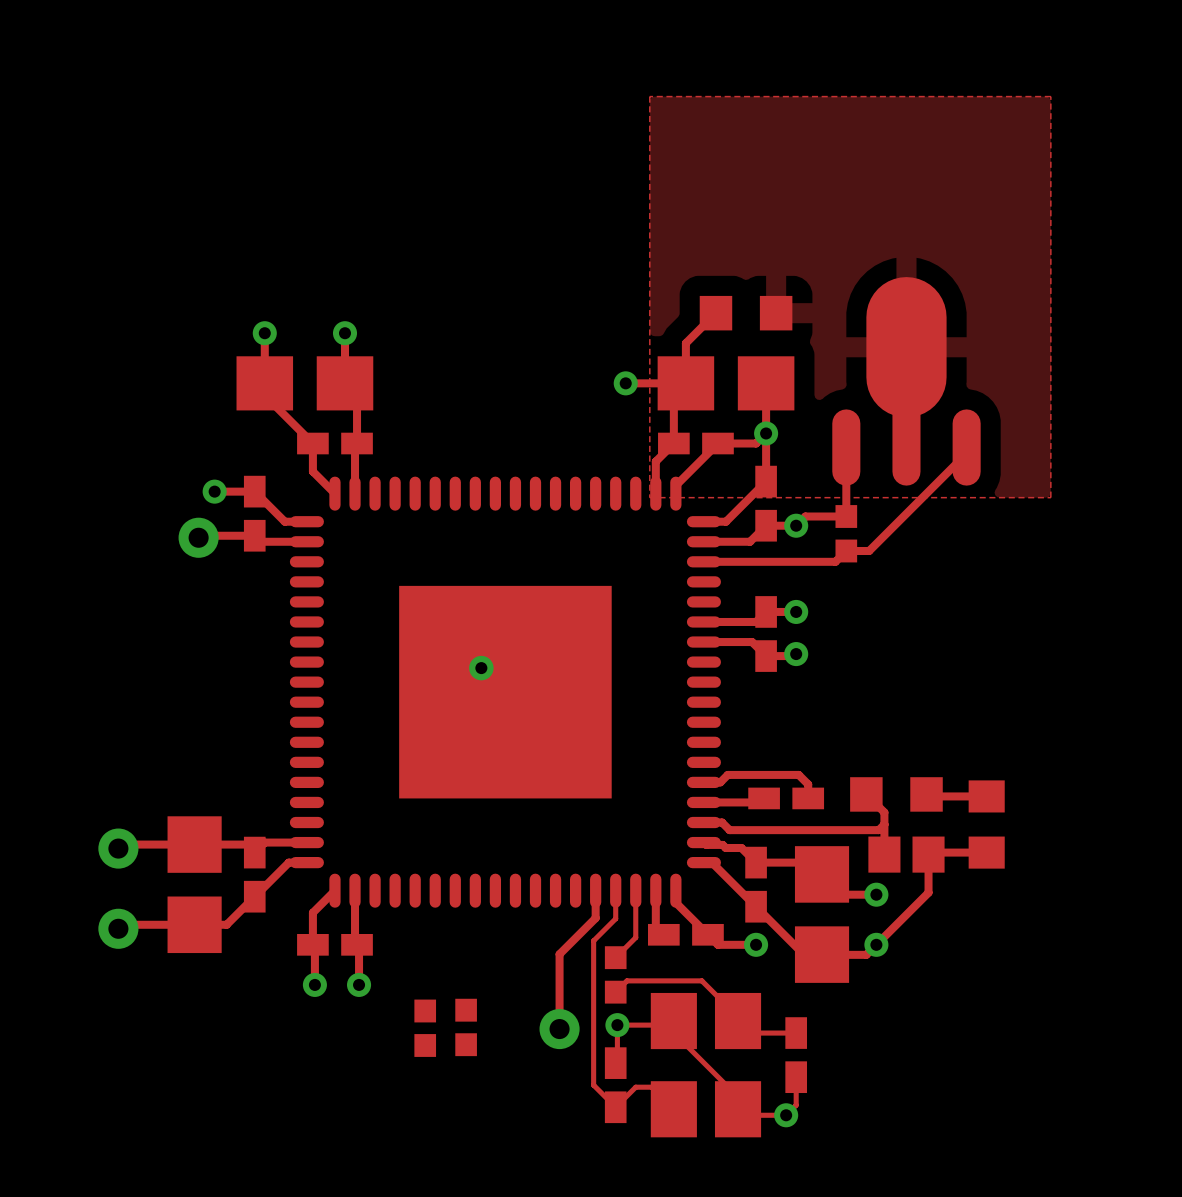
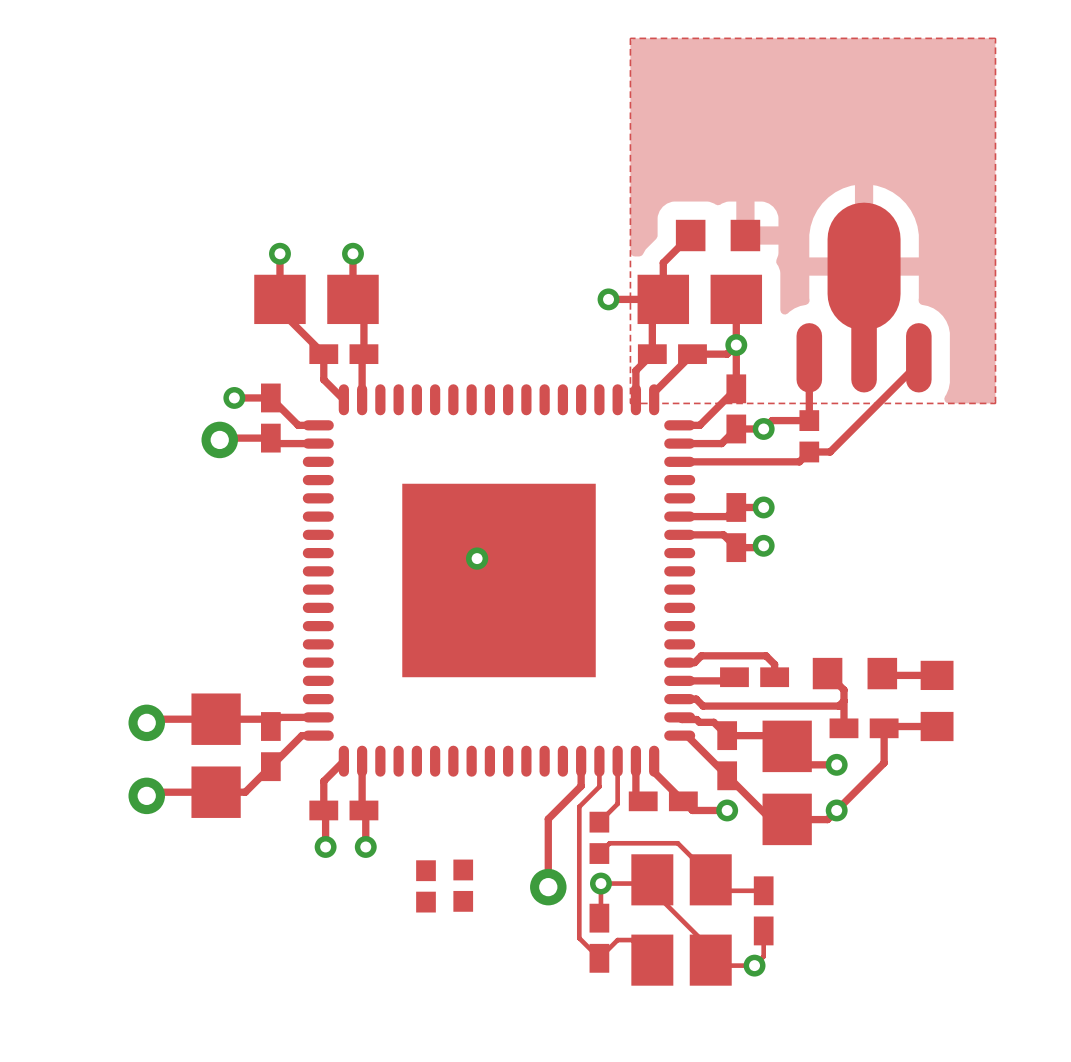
part footprint: [868, 836, 945, 873] -> [829, 718, 899, 739]

